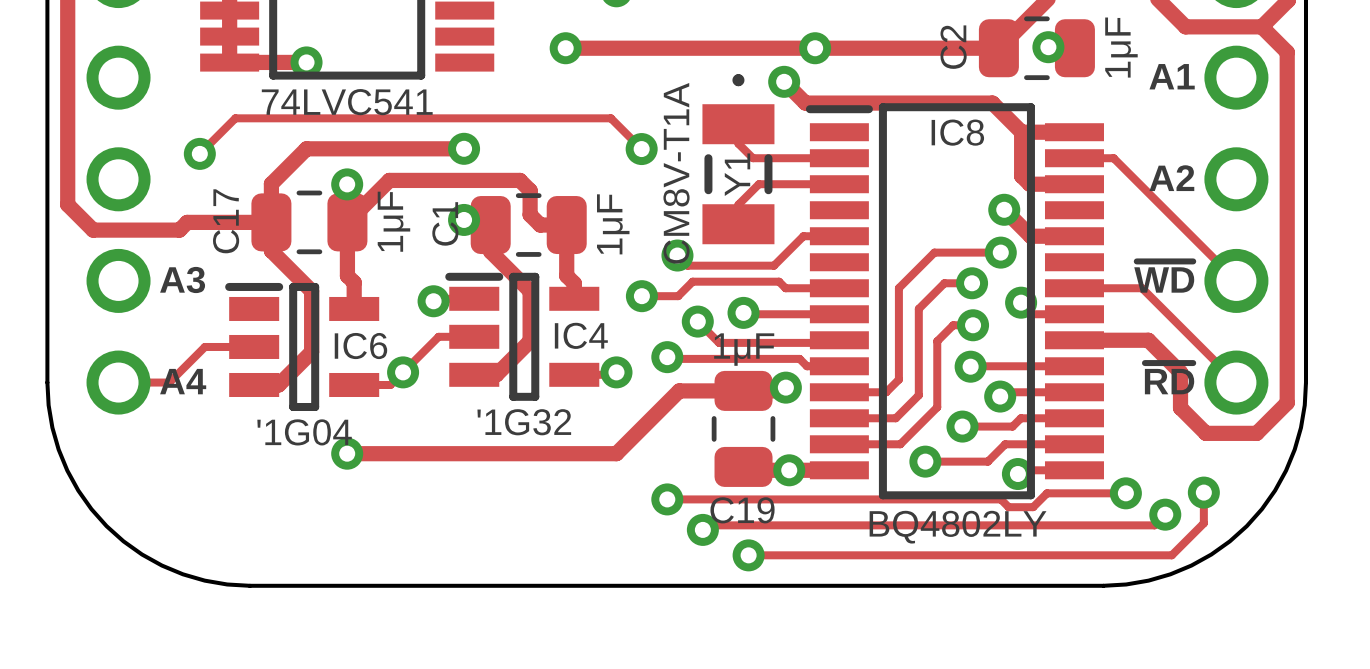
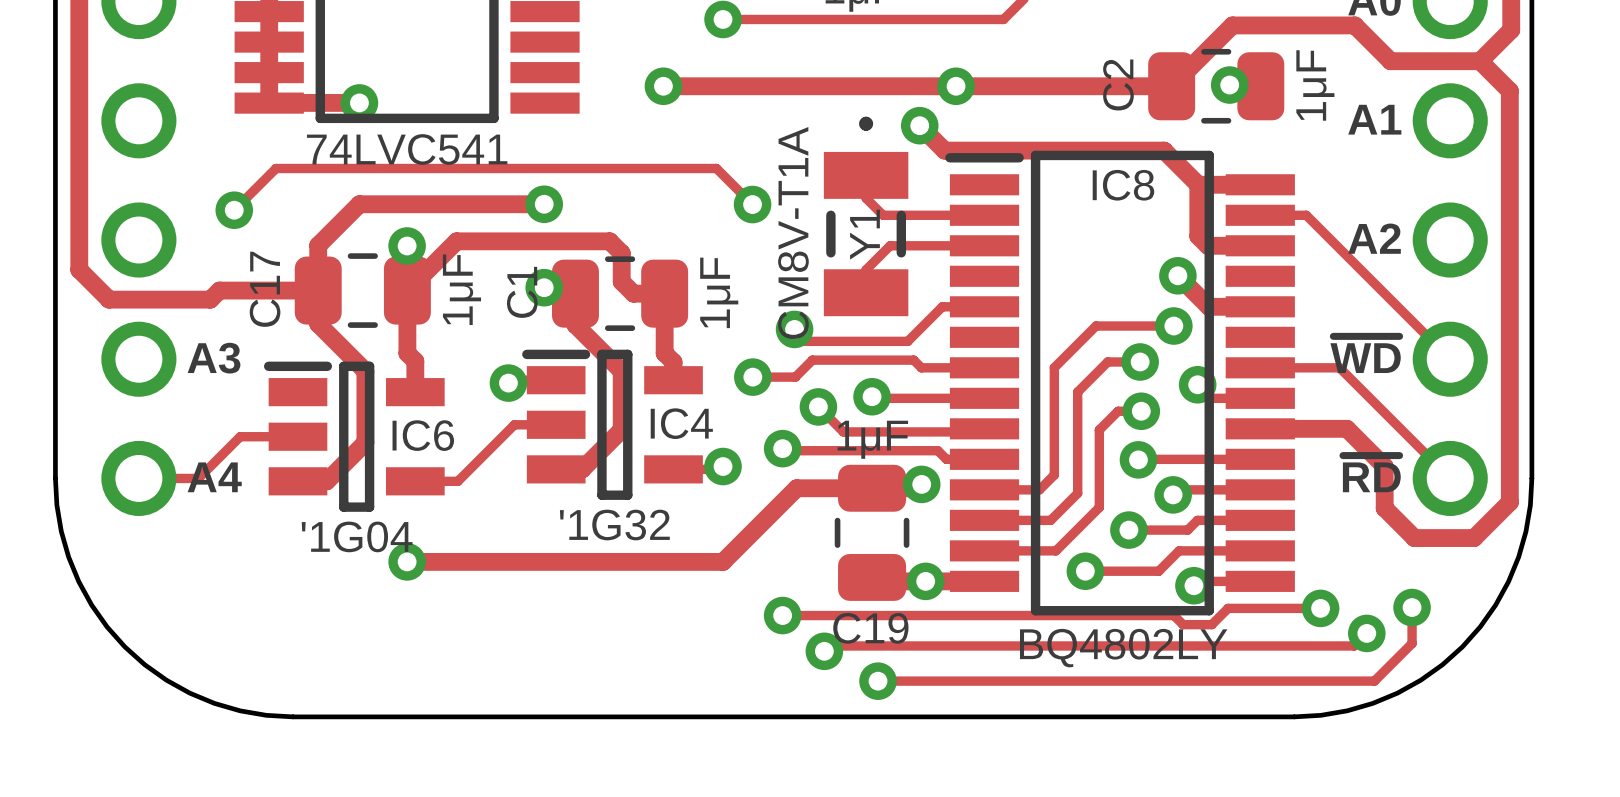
via: (403, 372) -> none

